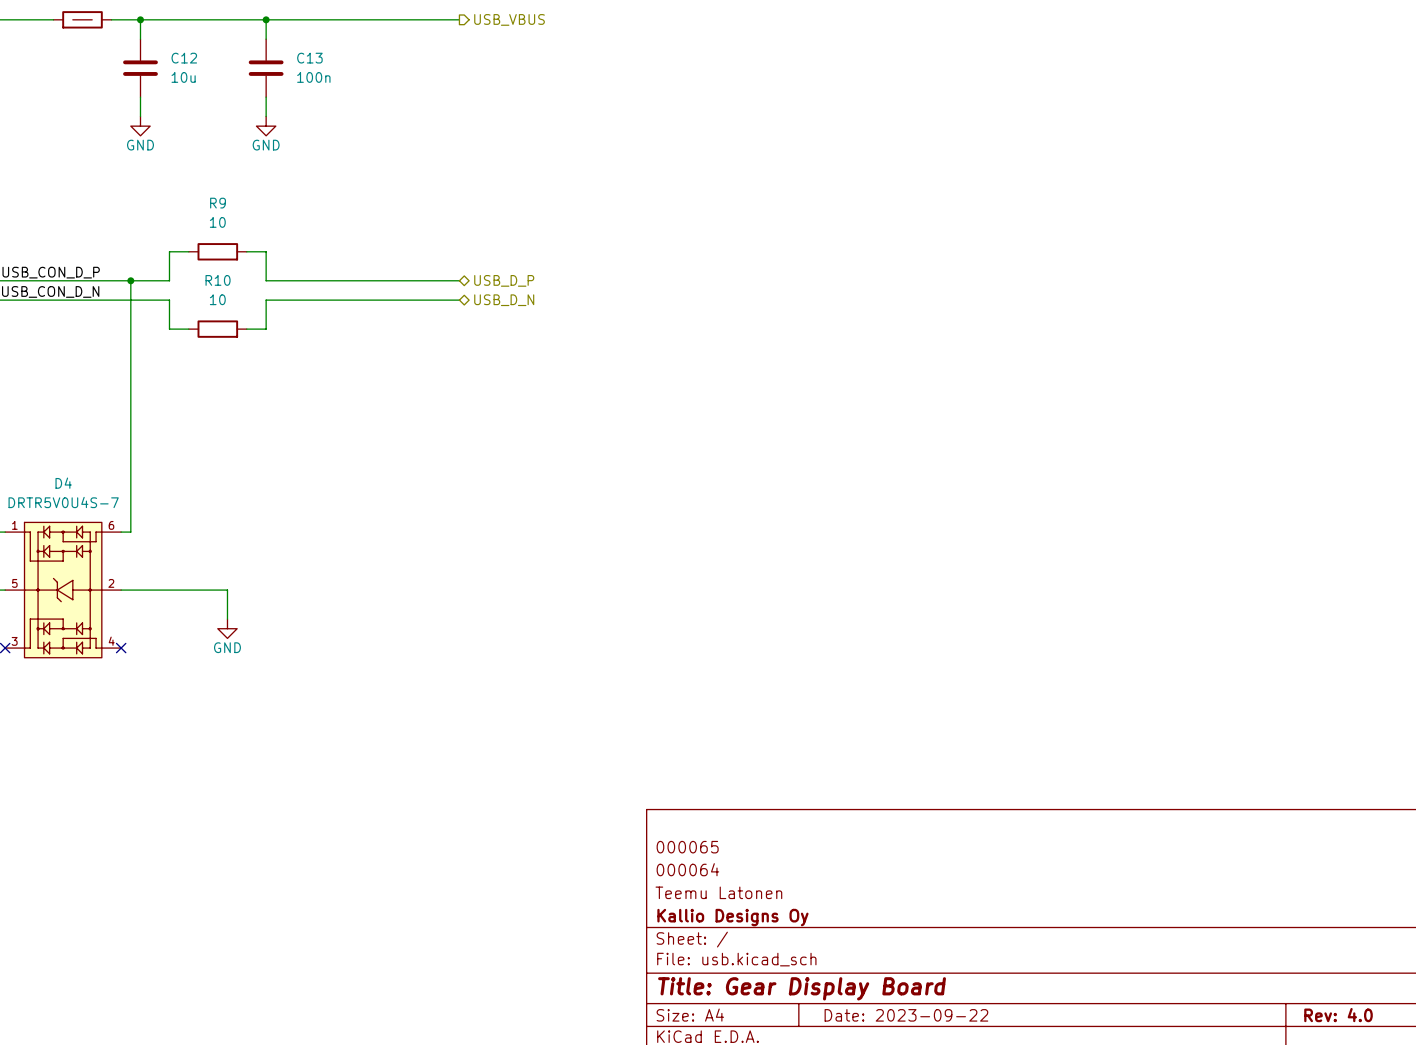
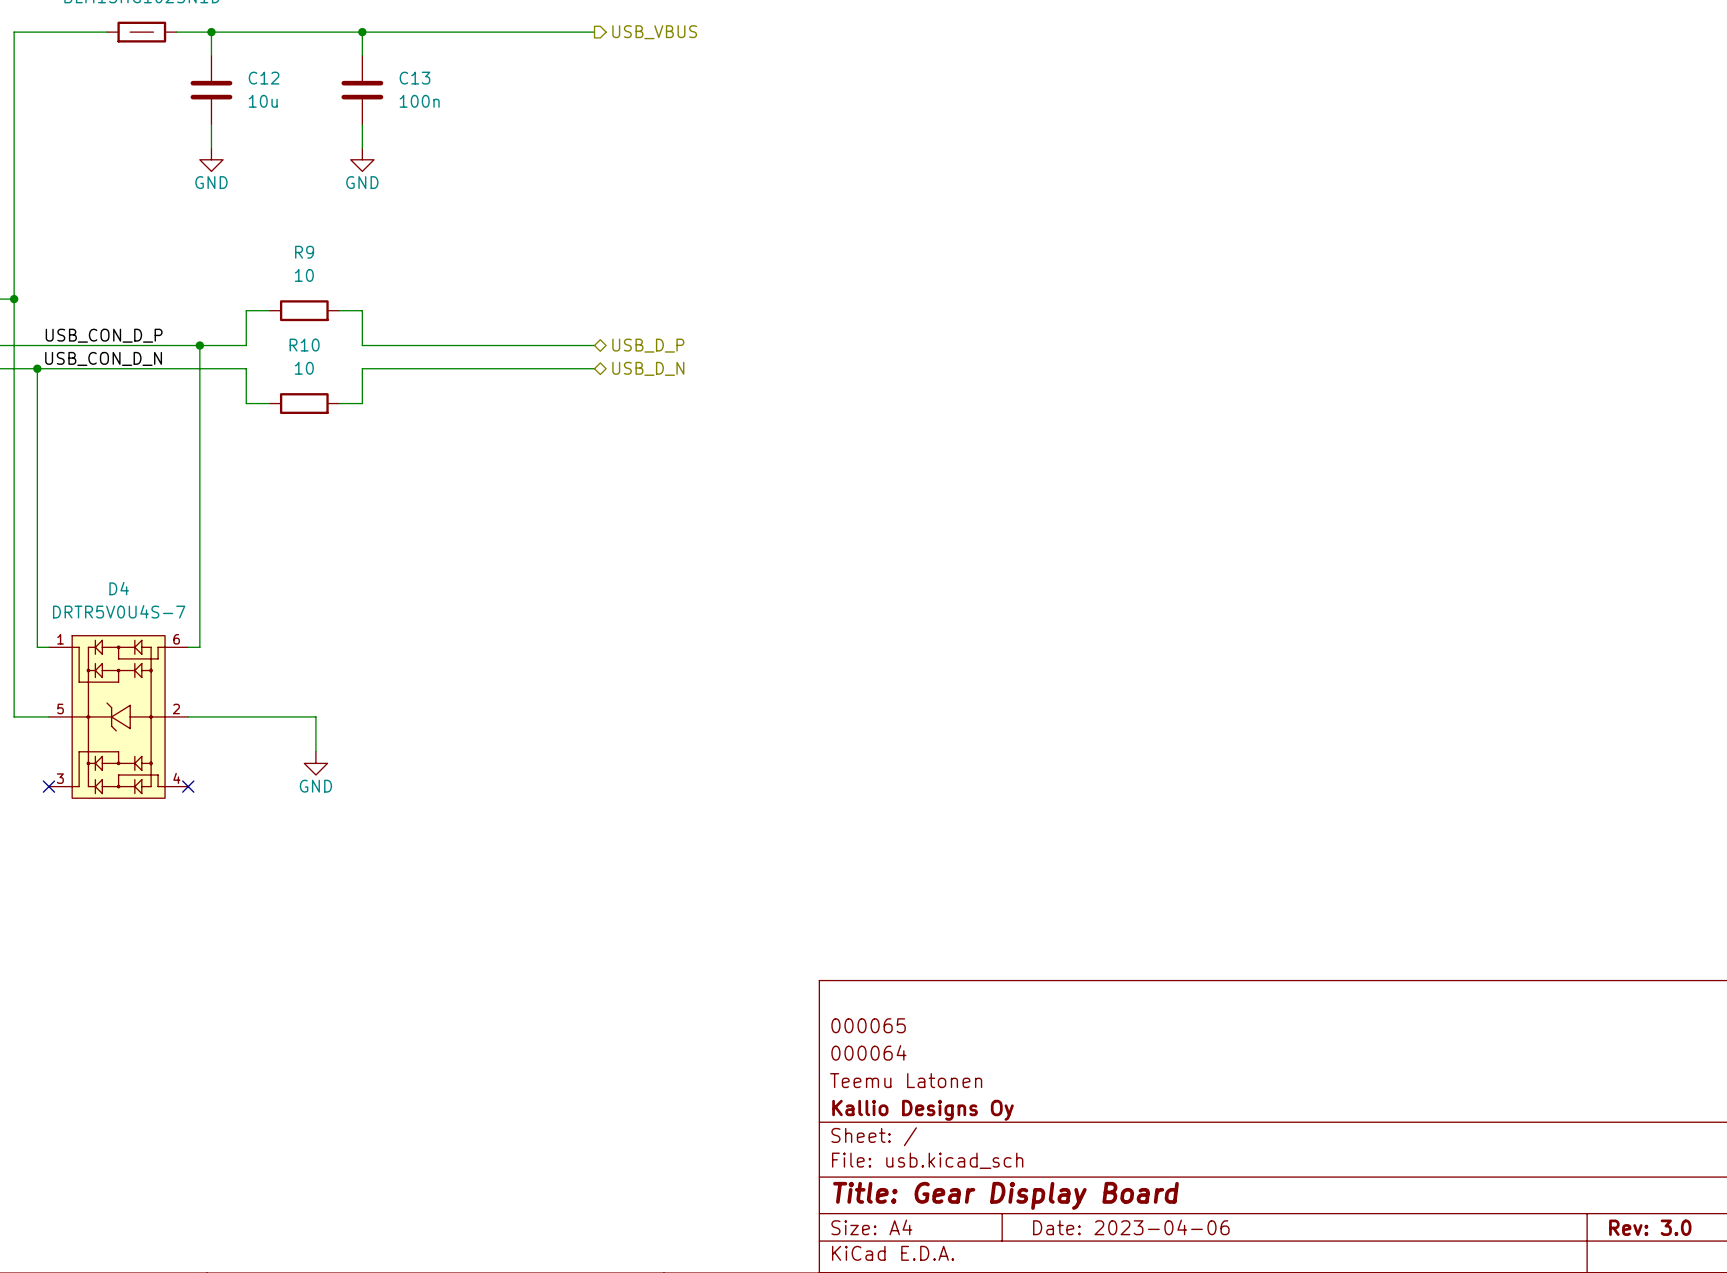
title block: Date: 2023-09-22 (906, 1015) -> Date: 2023-04-06 (1131, 1227)
title block: Rev: 4.0 (1338, 1015) -> Rev: 3.0 (1650, 1227)

